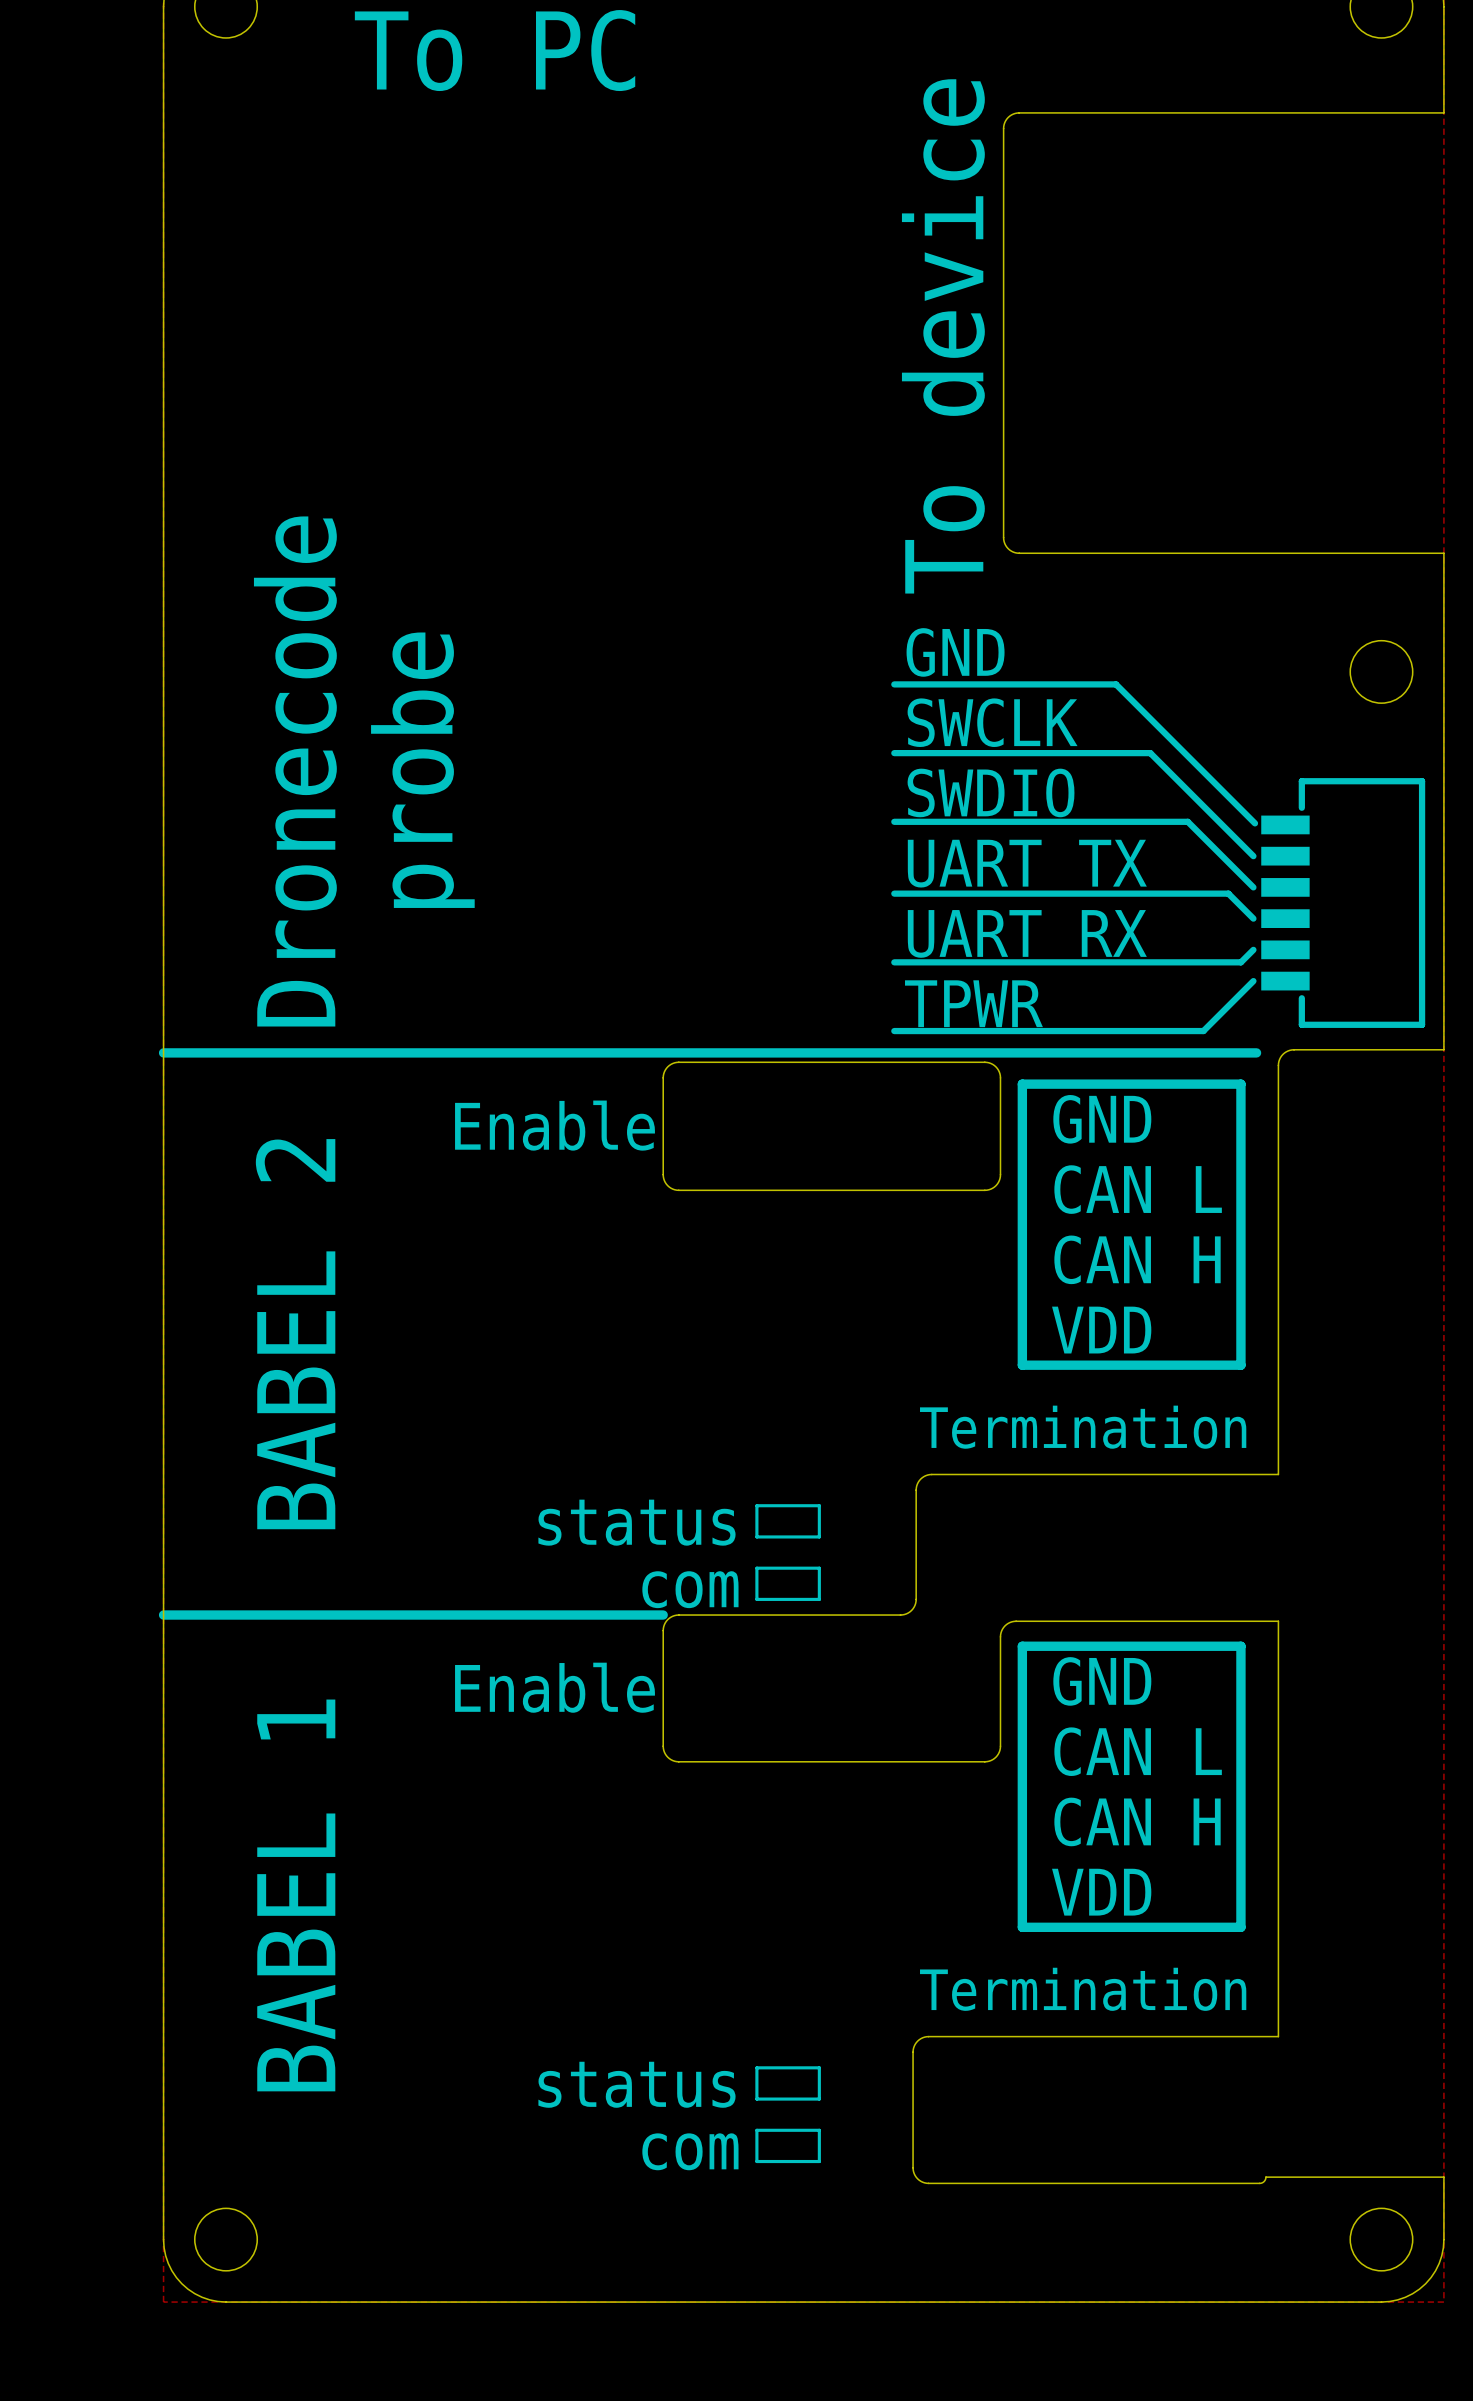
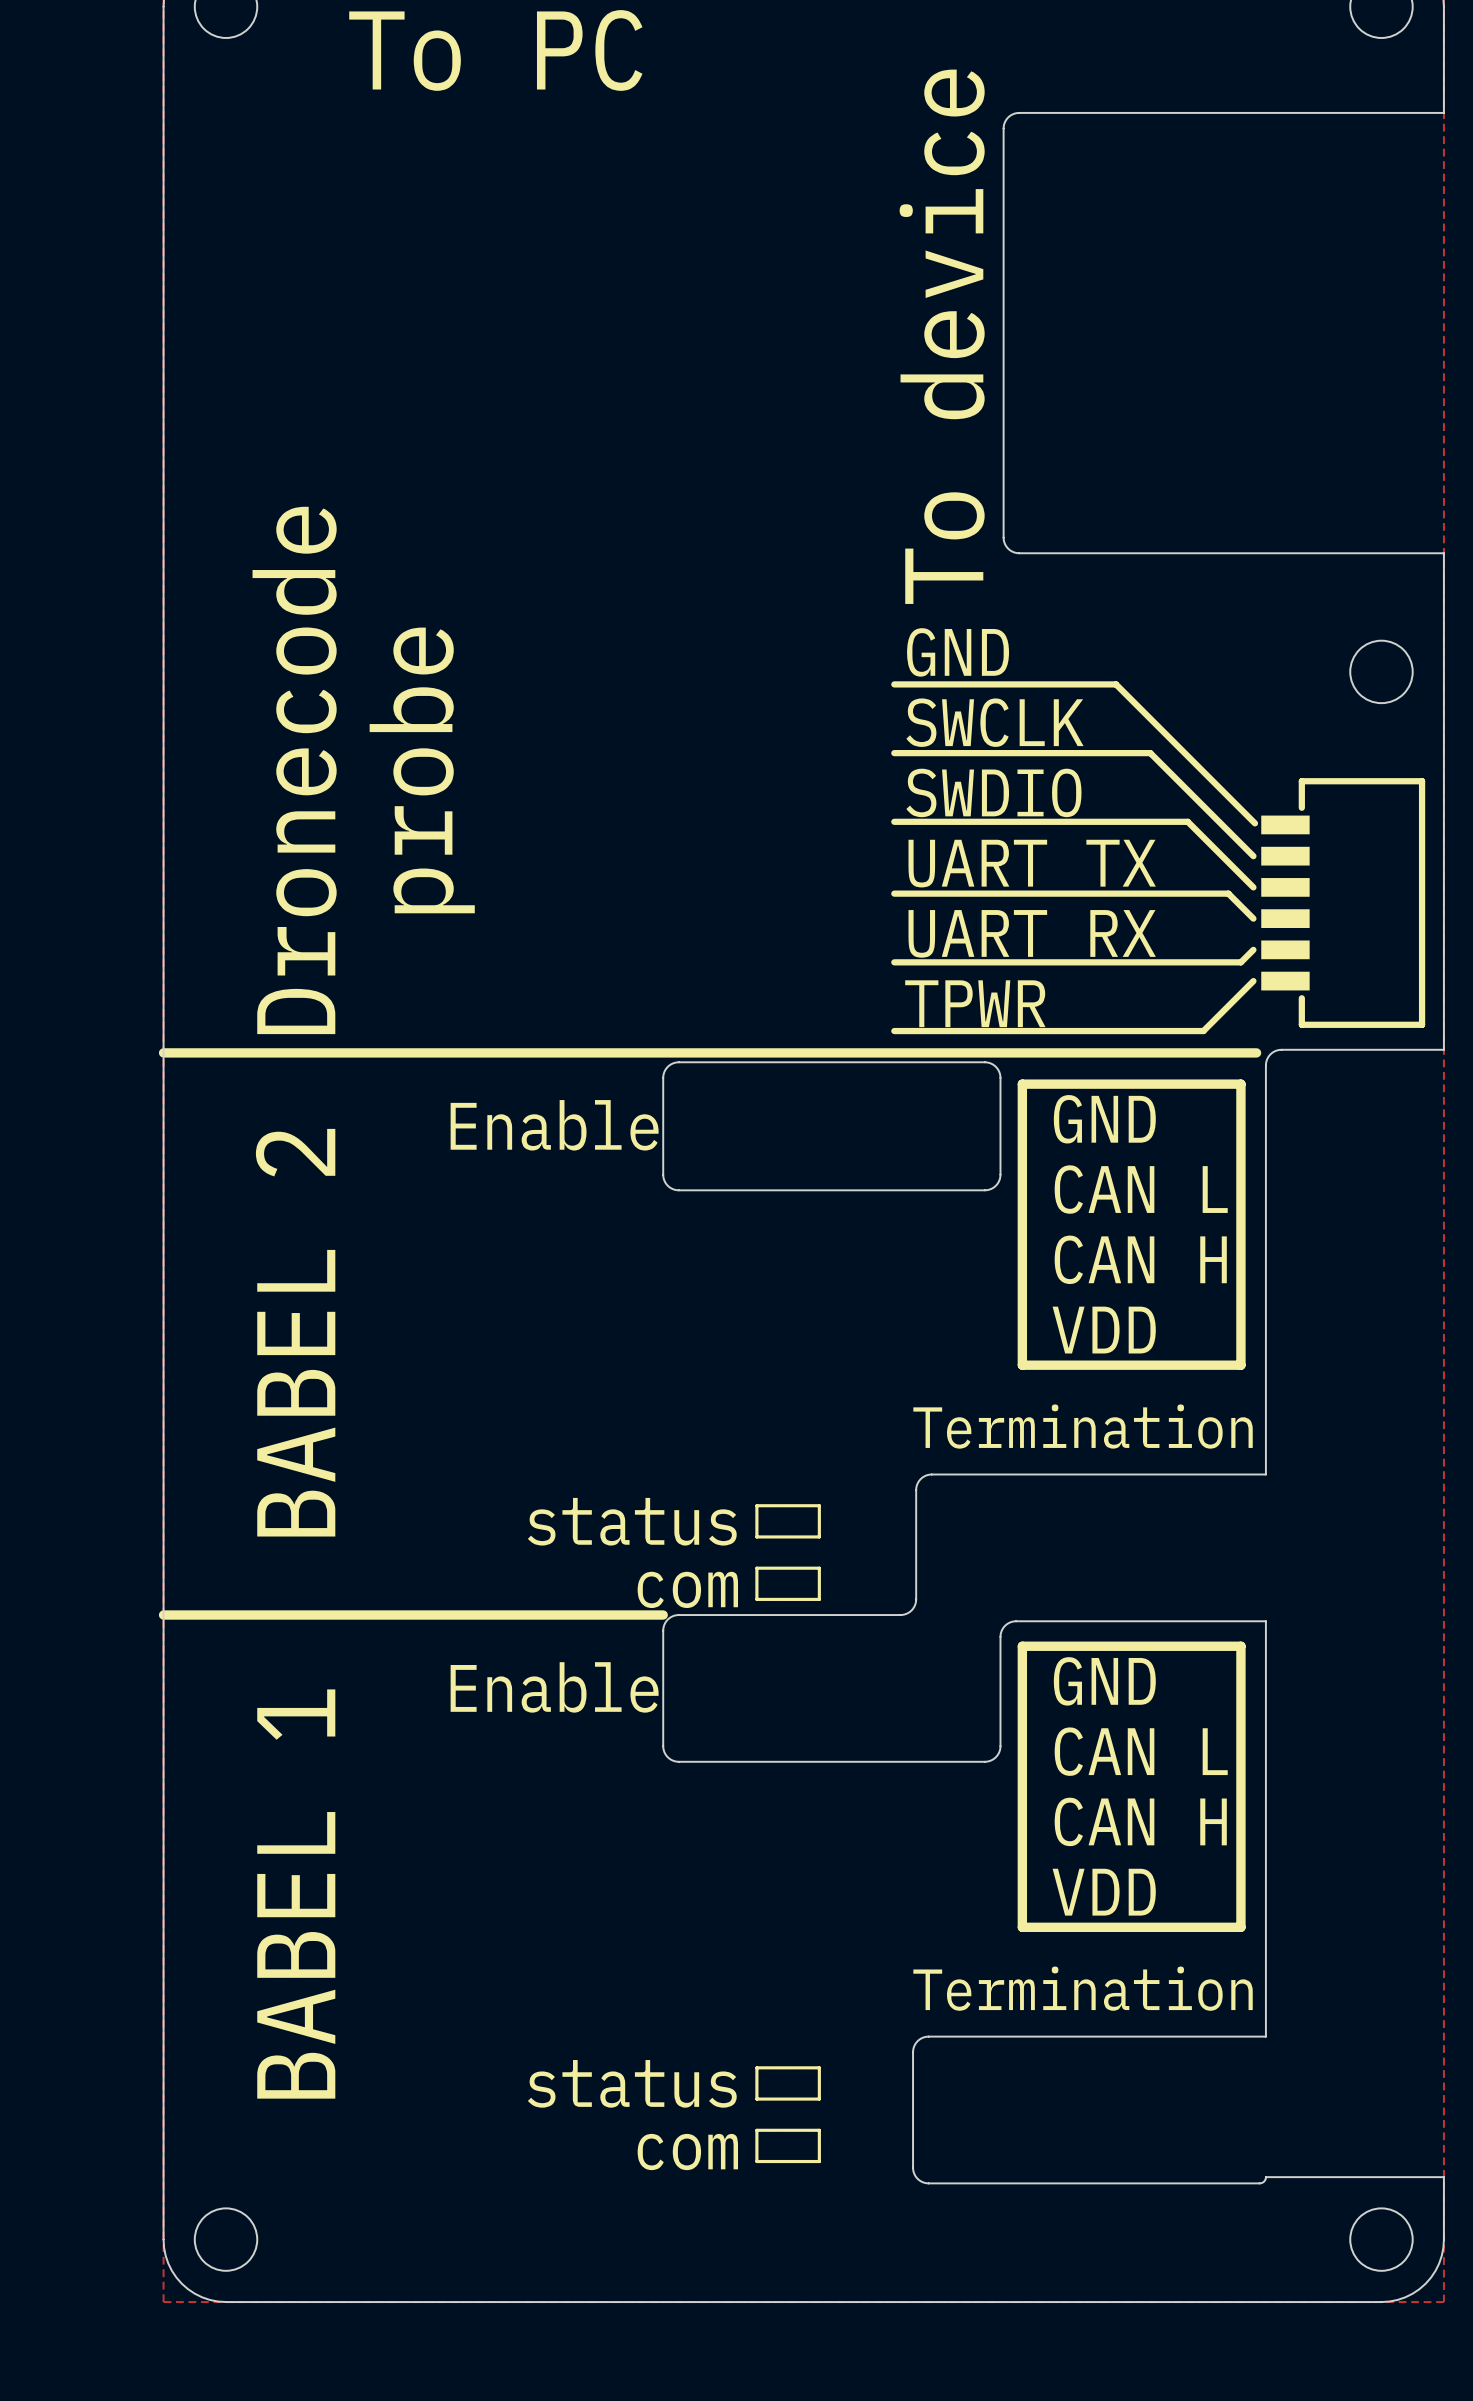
board edge: (1294, 1049) (1282, 1054) (1278, 1063) (1278, 1474) (1265, 1474) -> (1294, 1049) (1275, 1050) (1269, 1055) (1266, 1063) (1265, 1474)
board edge: (1265, 1621) (1278, 1621) (1278, 2036) (1265, 2036) -> (1265, 1621) (1265, 2036)

